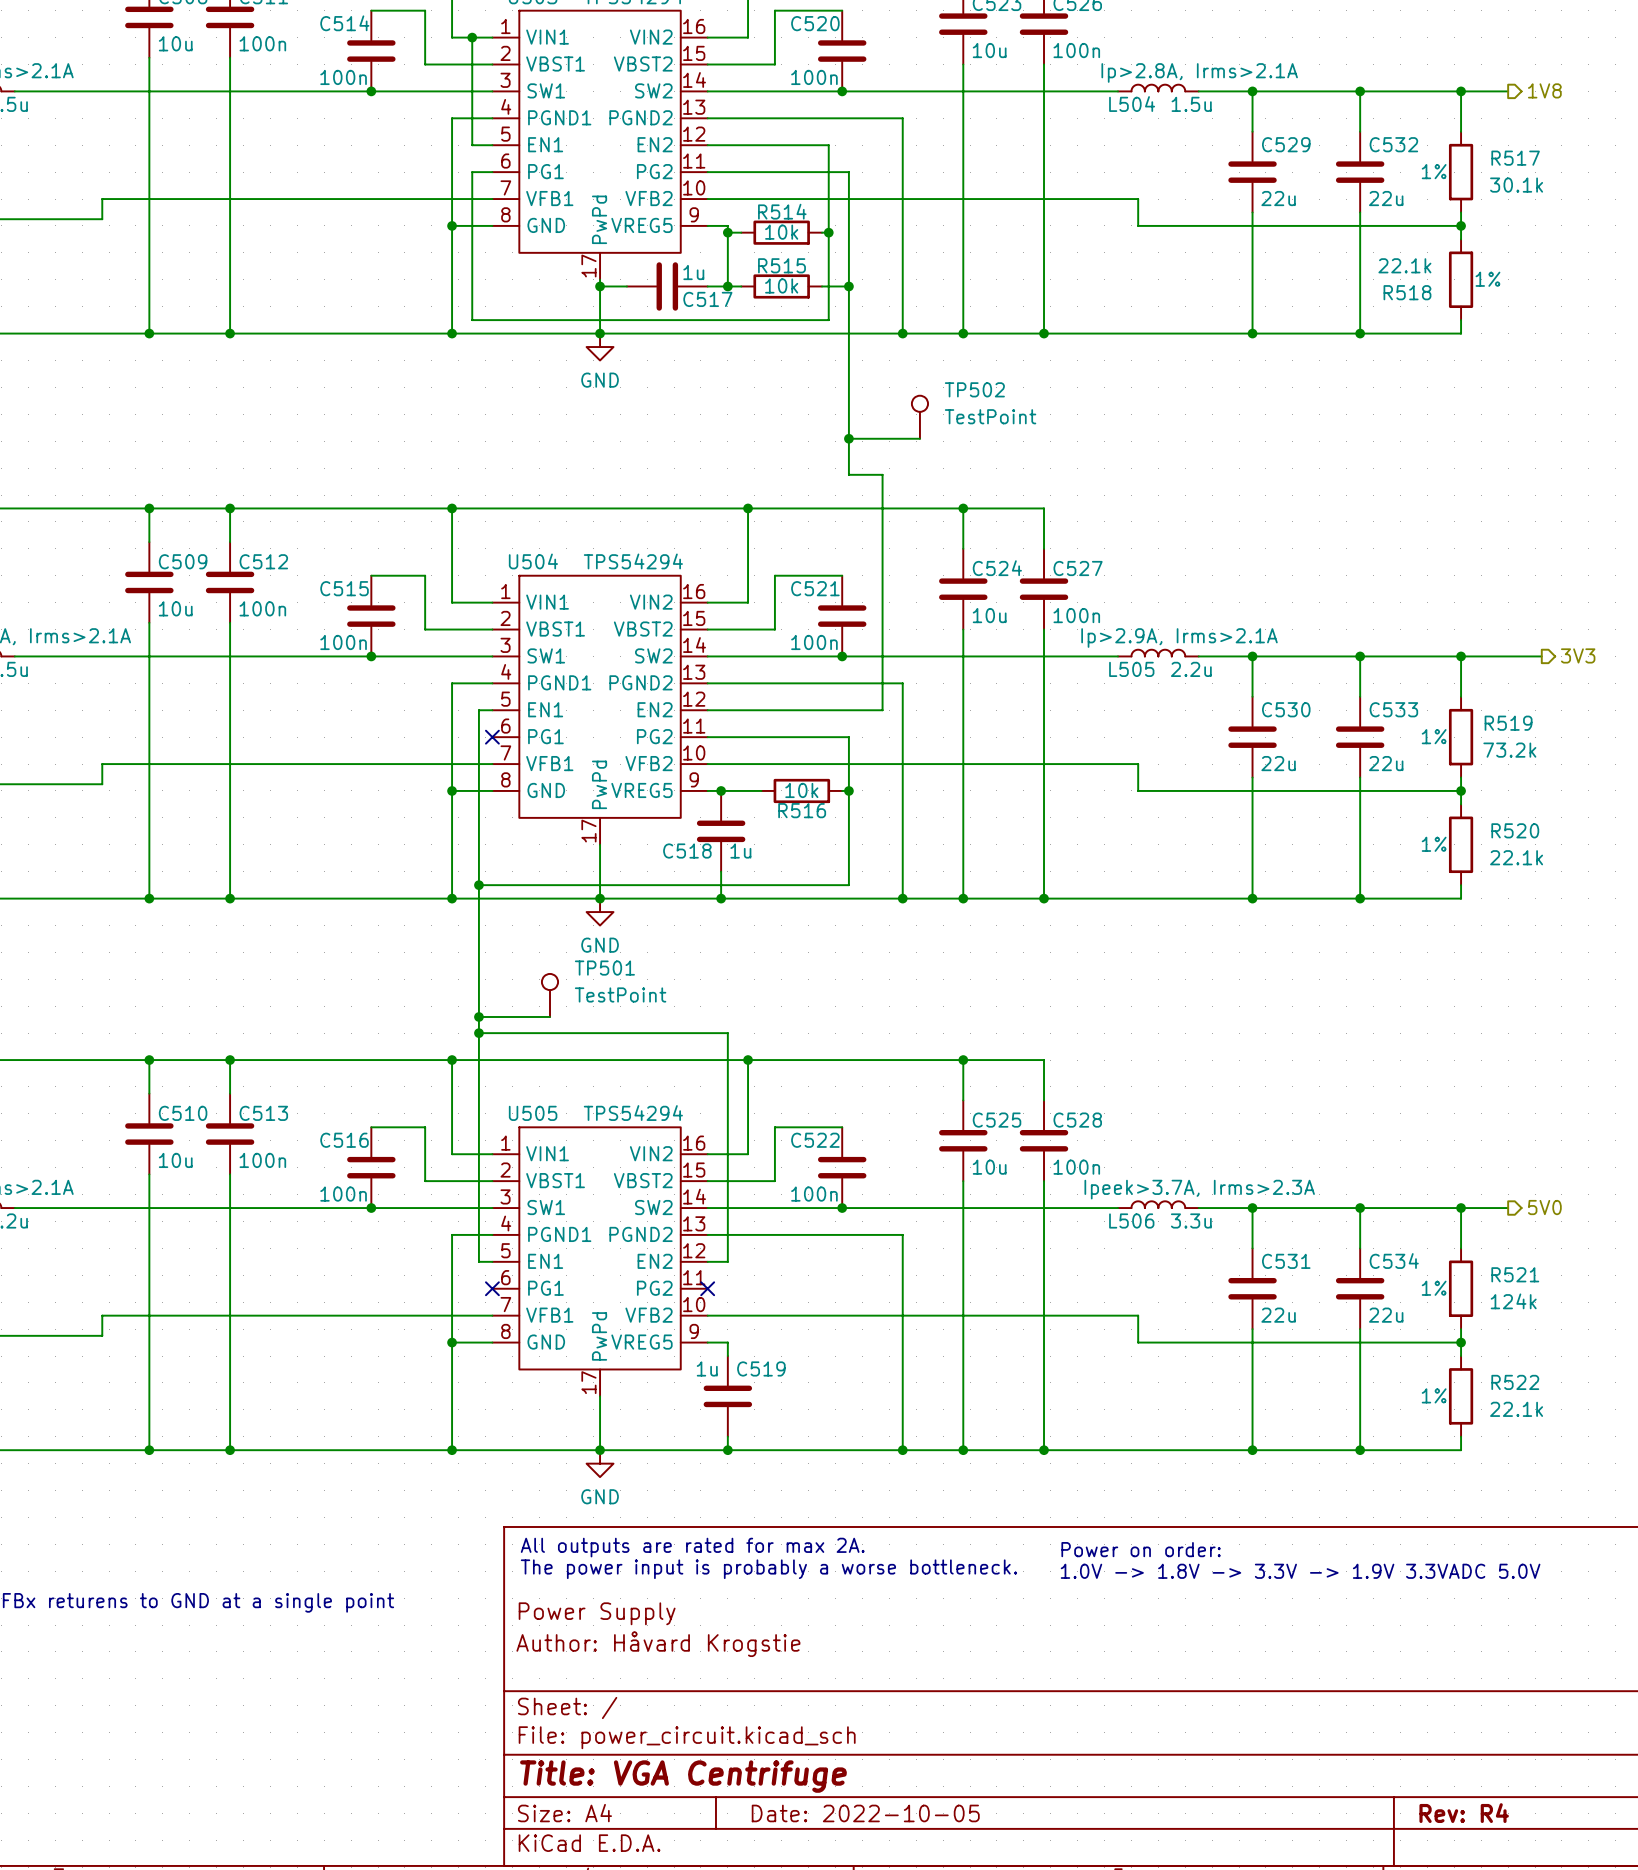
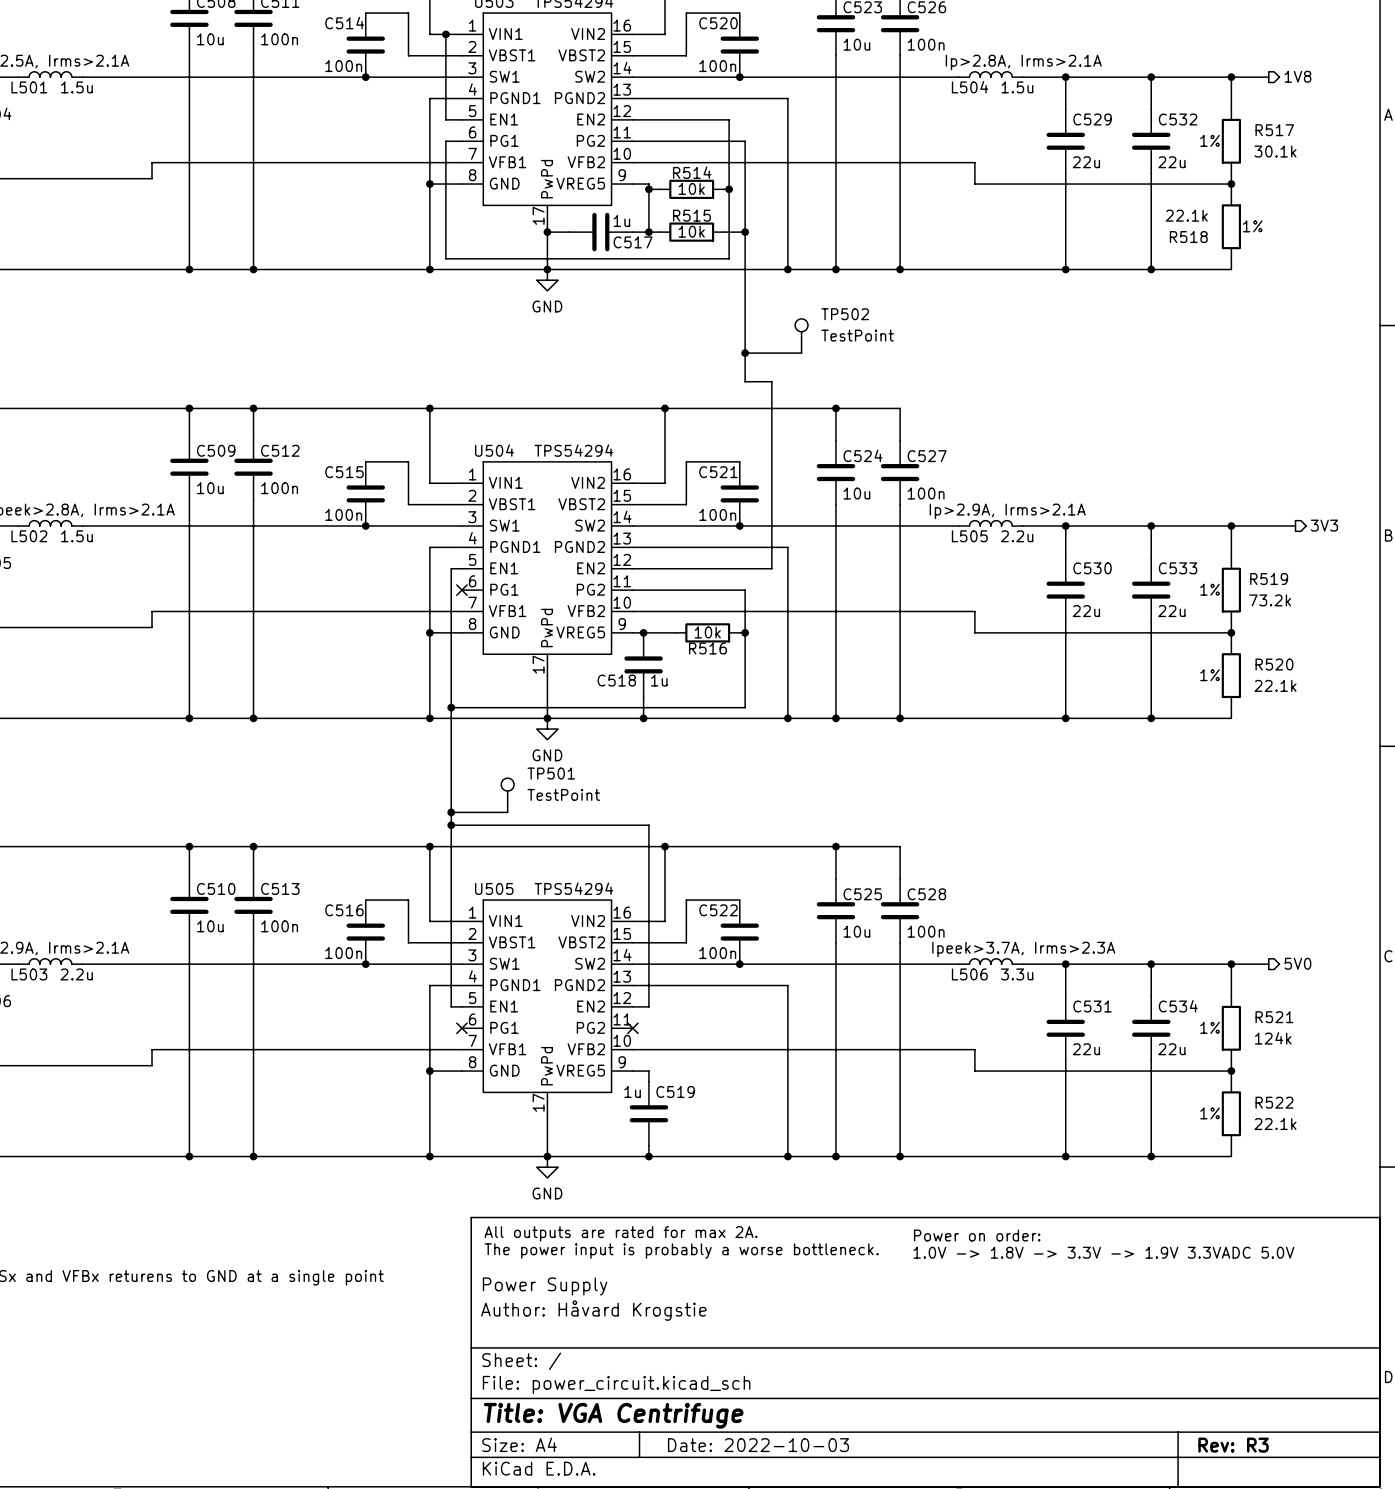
title block: Date: 2022-10-05 (865, 1813) -> Date: 2022-10-03 (758, 1445)
title block: Rev: R4 (1464, 1813) -> Rev: R3 (1233, 1445)

